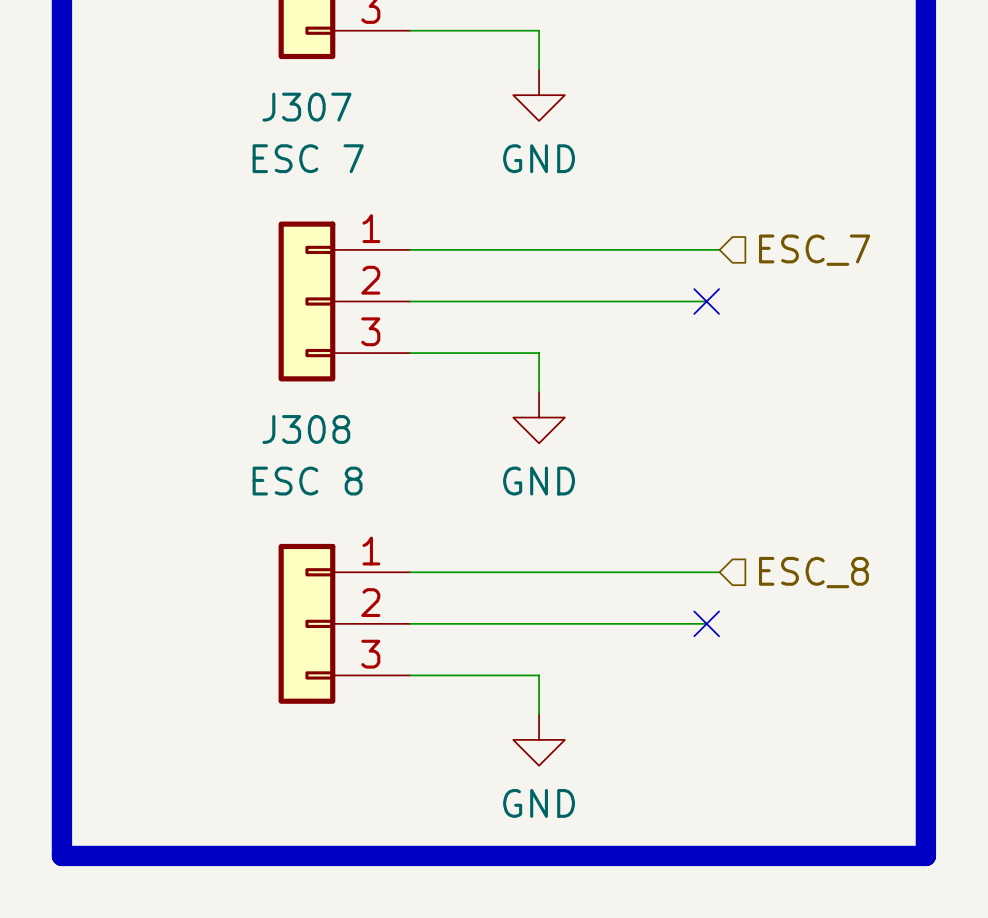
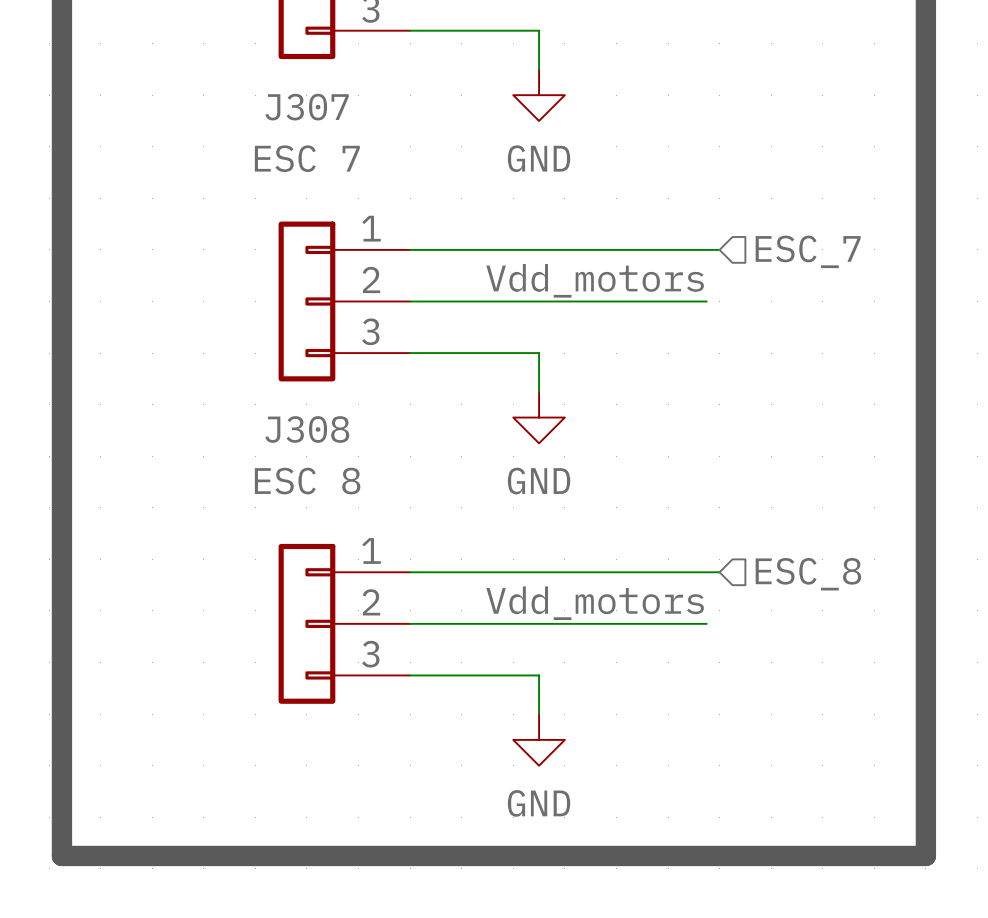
label: none -> Vdd_motors (595, 280)
no-connect mark: (706, 301) -> none
label: none -> Vdd_motors (595, 603)
no-connect mark: (706, 623) -> none

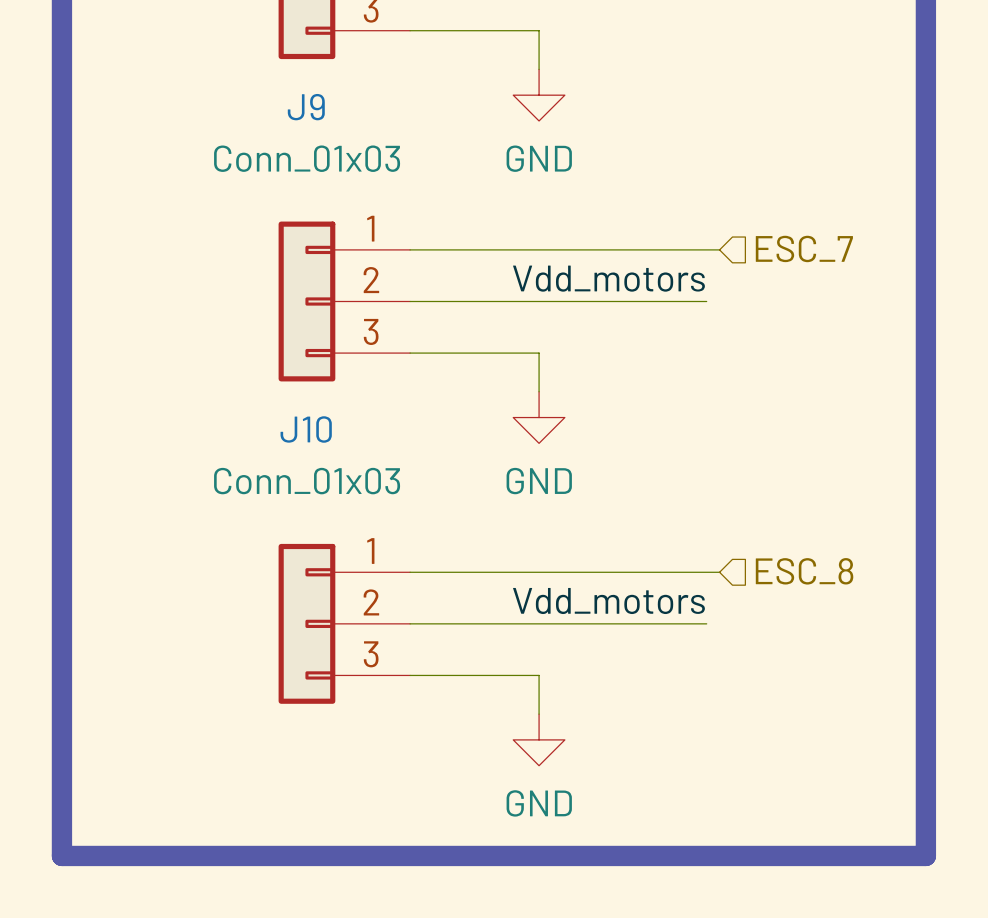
J307 name: J307 (307, 107) -> J9 (306, 107)
J307 value: ESC 7 (307, 158) -> Conn_01x03 (307, 158)
J308 name: J308 (307, 429) -> J10 (306, 429)
J308 value: ESC 8 (307, 481) -> Conn_01x03 (307, 481)

